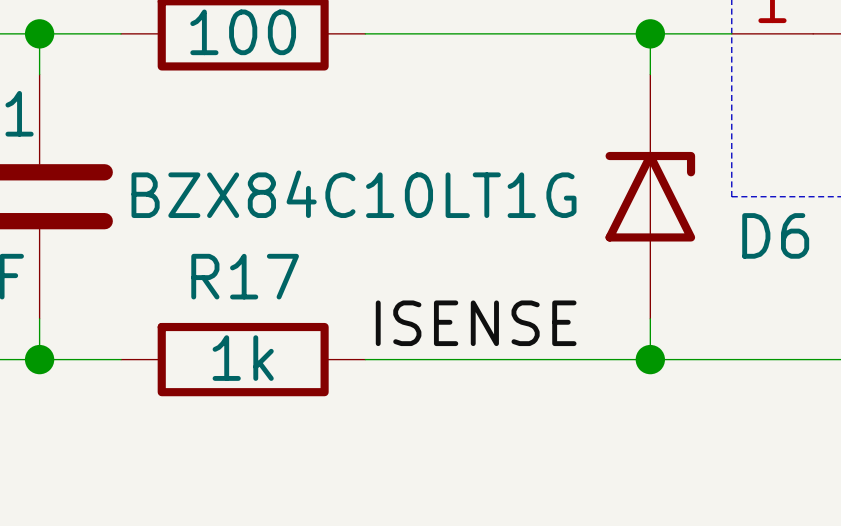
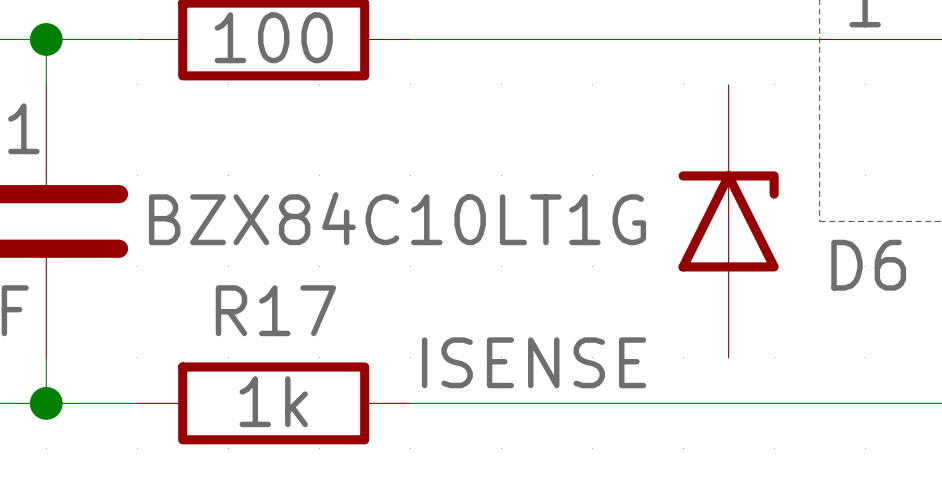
wire: (650, 33) (650, 74) -> none
junction: (650, 33) -> none
wire: (650, 318) (650, 359) -> none
junction: (650, 359) -> none

